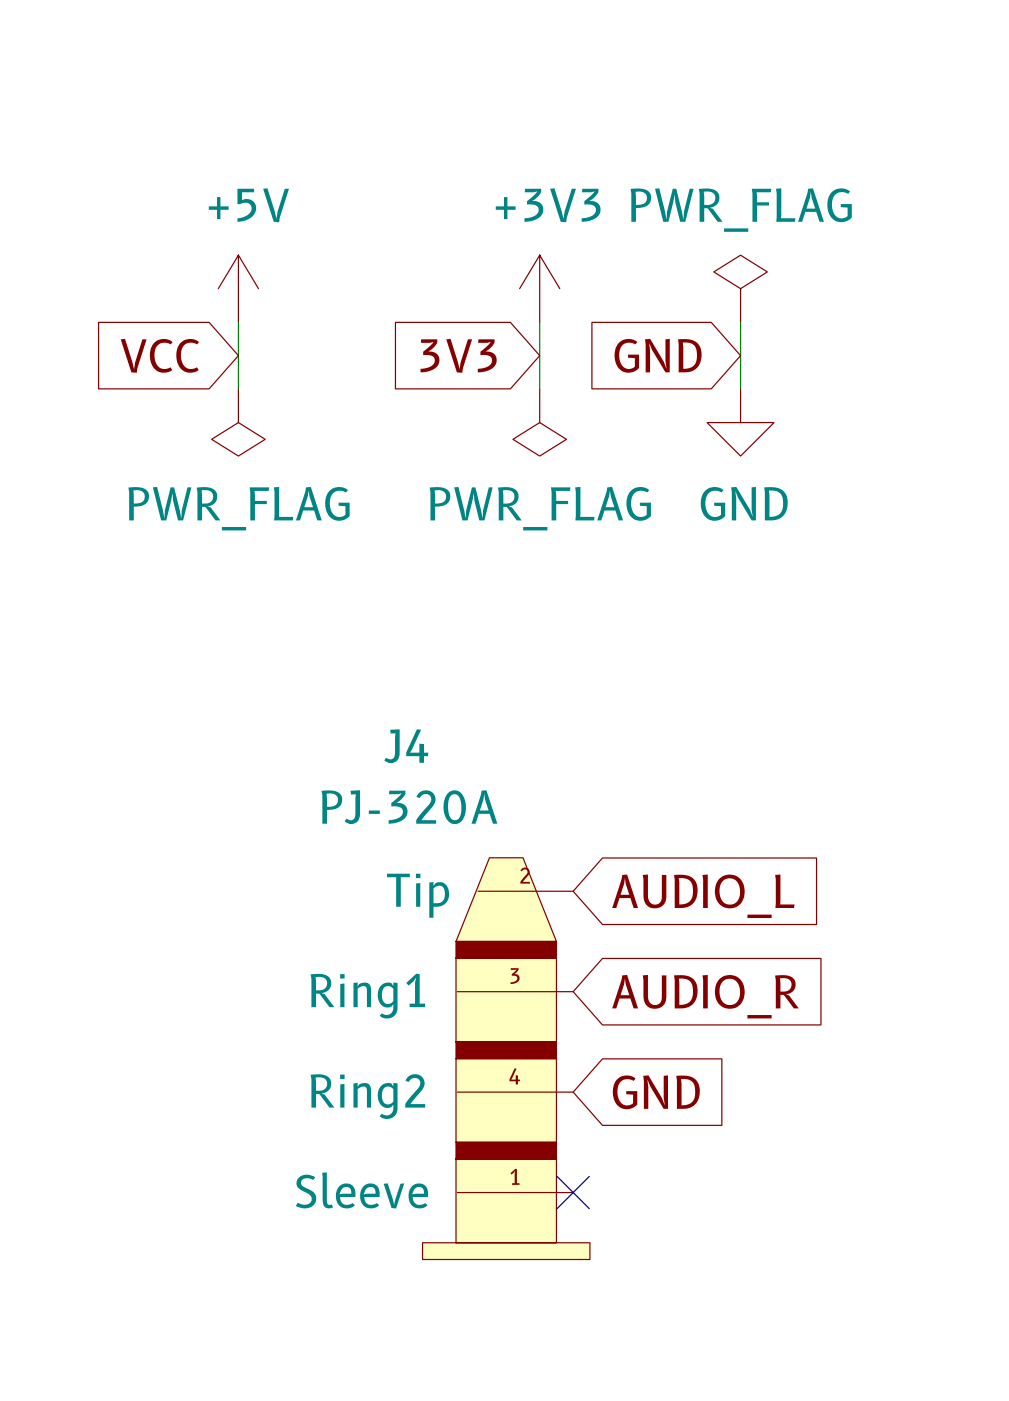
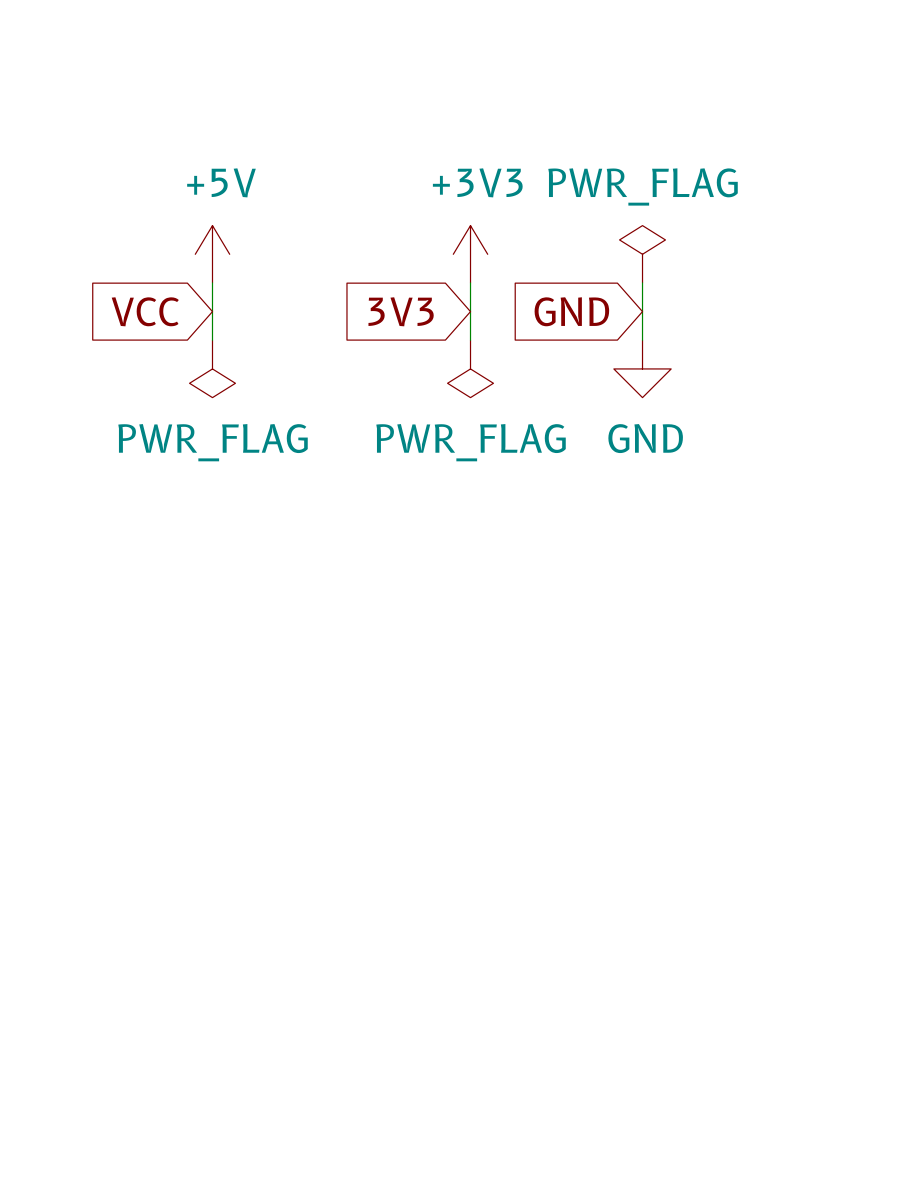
global label: AUDIO_L (703, 896) -> none
global label: AUDIO_R (705, 996) -> none
J4: PJ-320A (506, 1058) -> none
global label: GND (656, 1092) -> none
no-connect mark: (573, 1192) -> none

